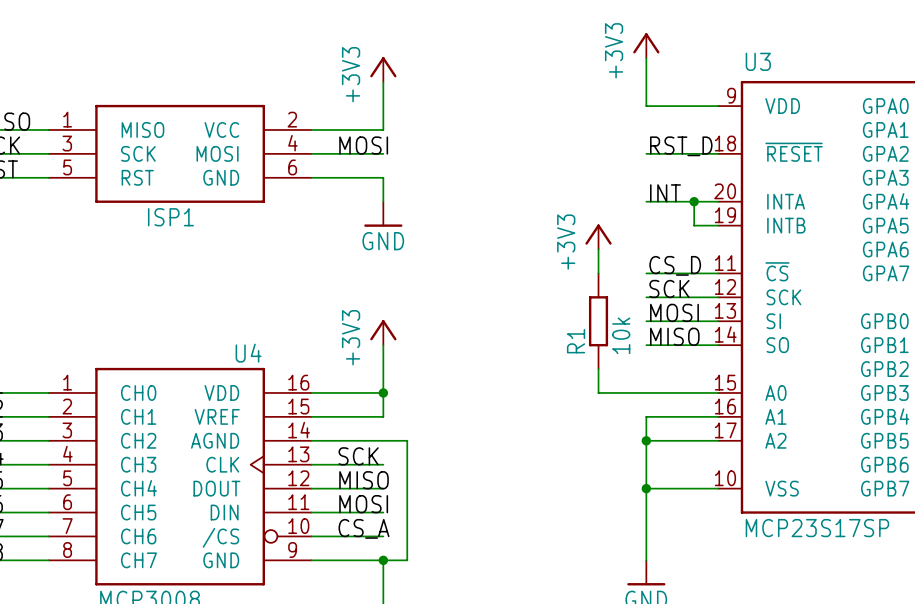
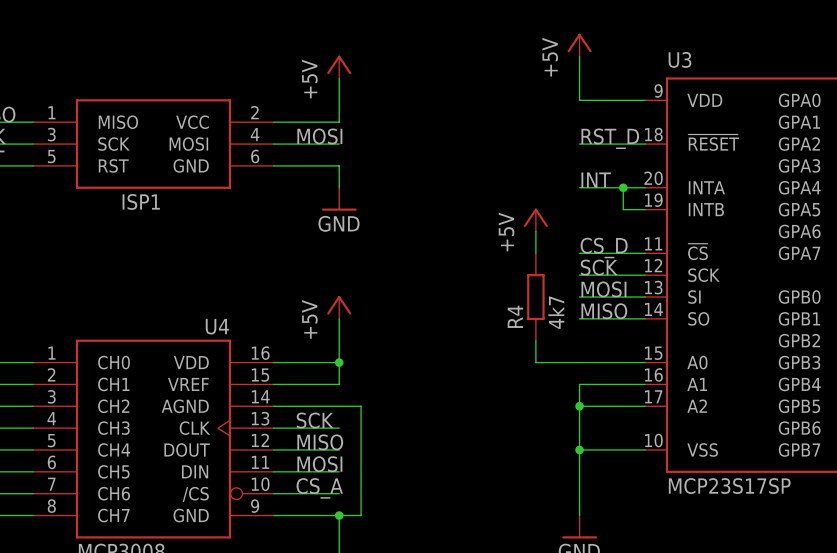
power symbol: +3V3 (646, 45) -> +5V (579, 45)
power symbol: +3V3 (383, 69) -> +5V (339, 67)
power symbol: +3V3 (598, 236) -> +5V (535, 220)
power symbol: +3V3 (383, 332) -> +5V (339, 307)
R1 value: 10k (621, 335) -> 4k7 (556, 312)
R1 name: R1 (576, 341) -> R4 (515, 316)

